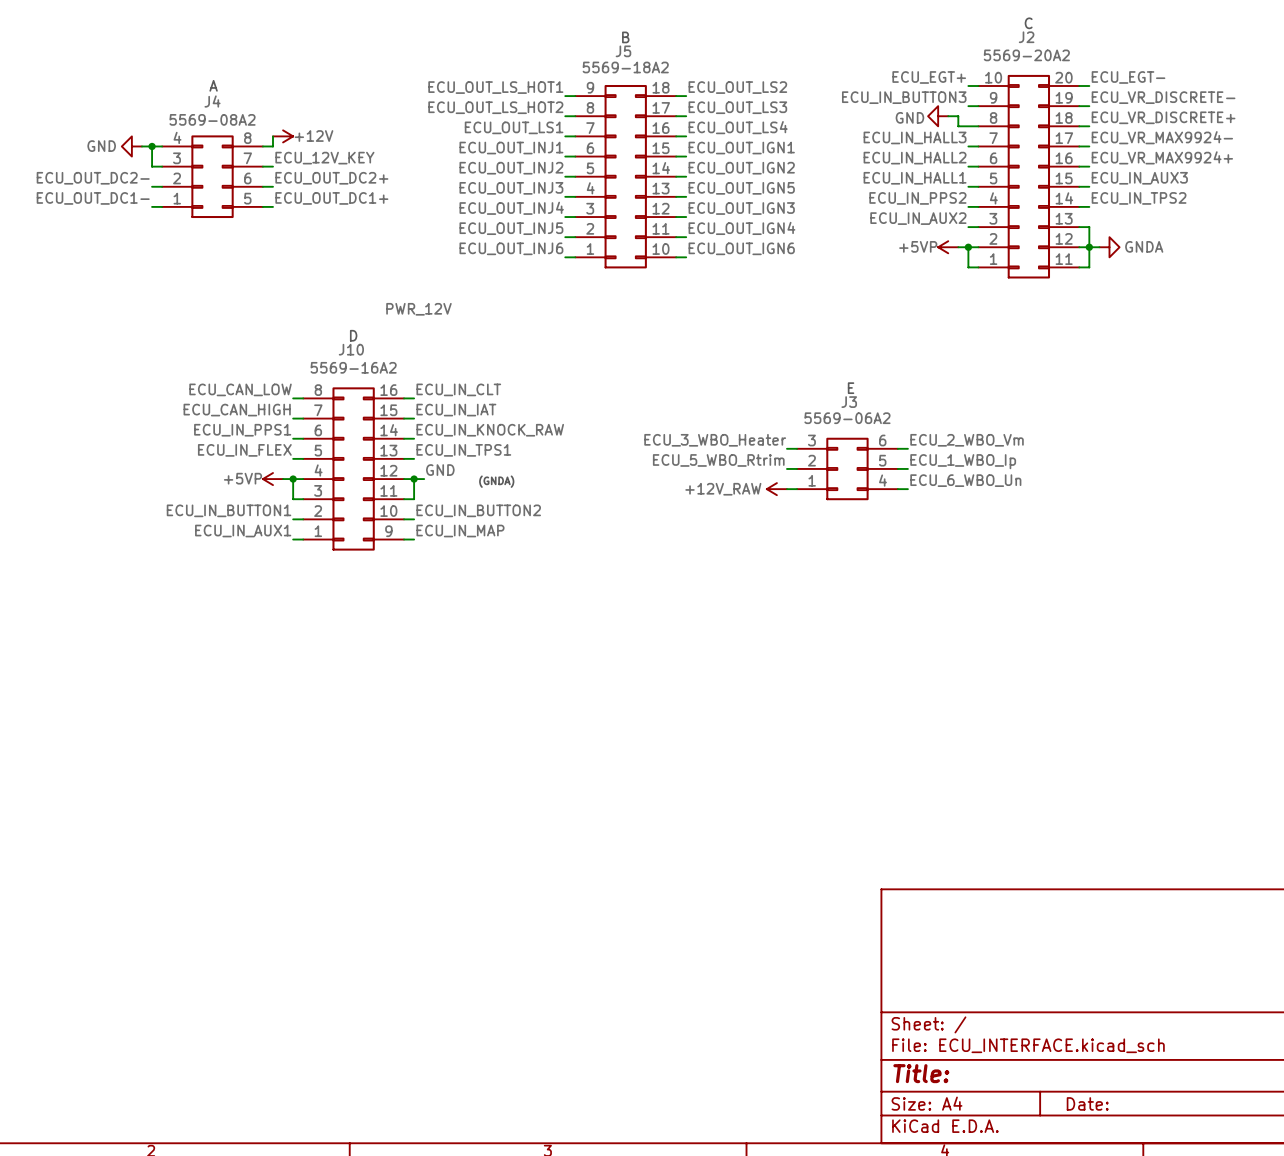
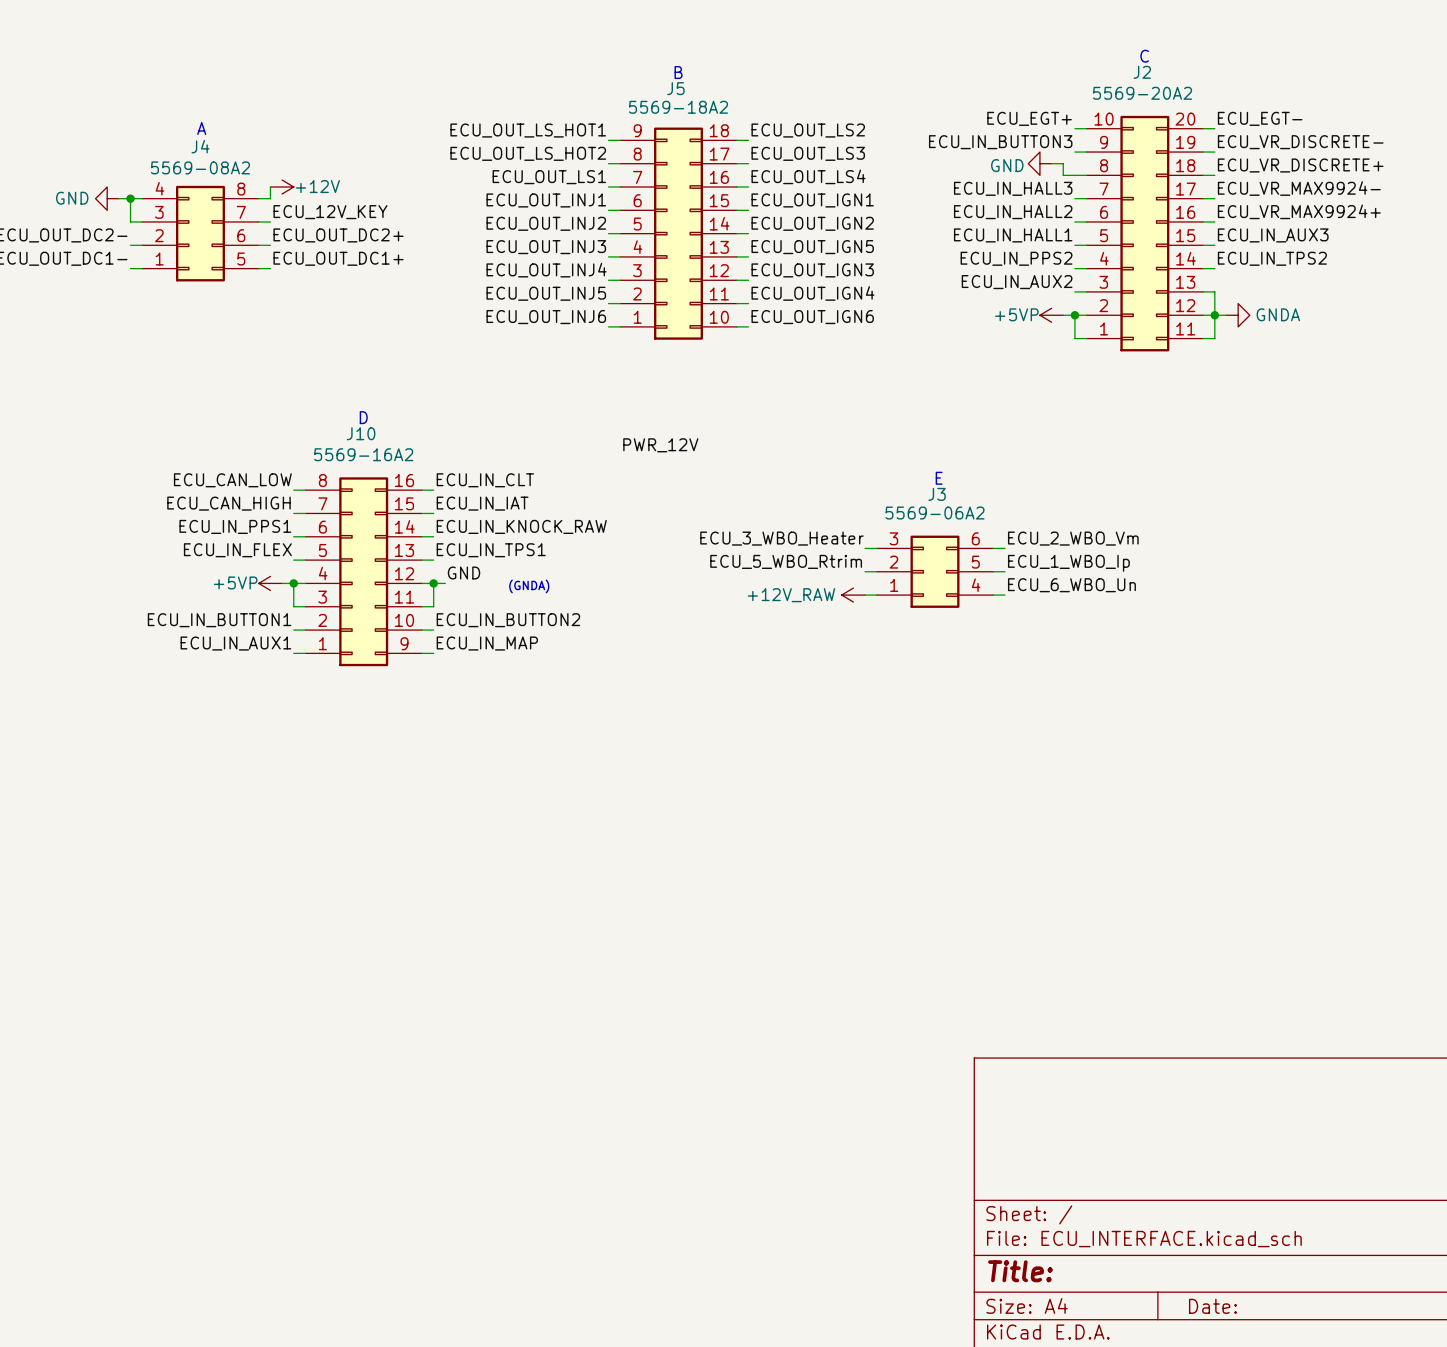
label position: PWR_12V (418, 309) -> PWR_12V (660, 445)

